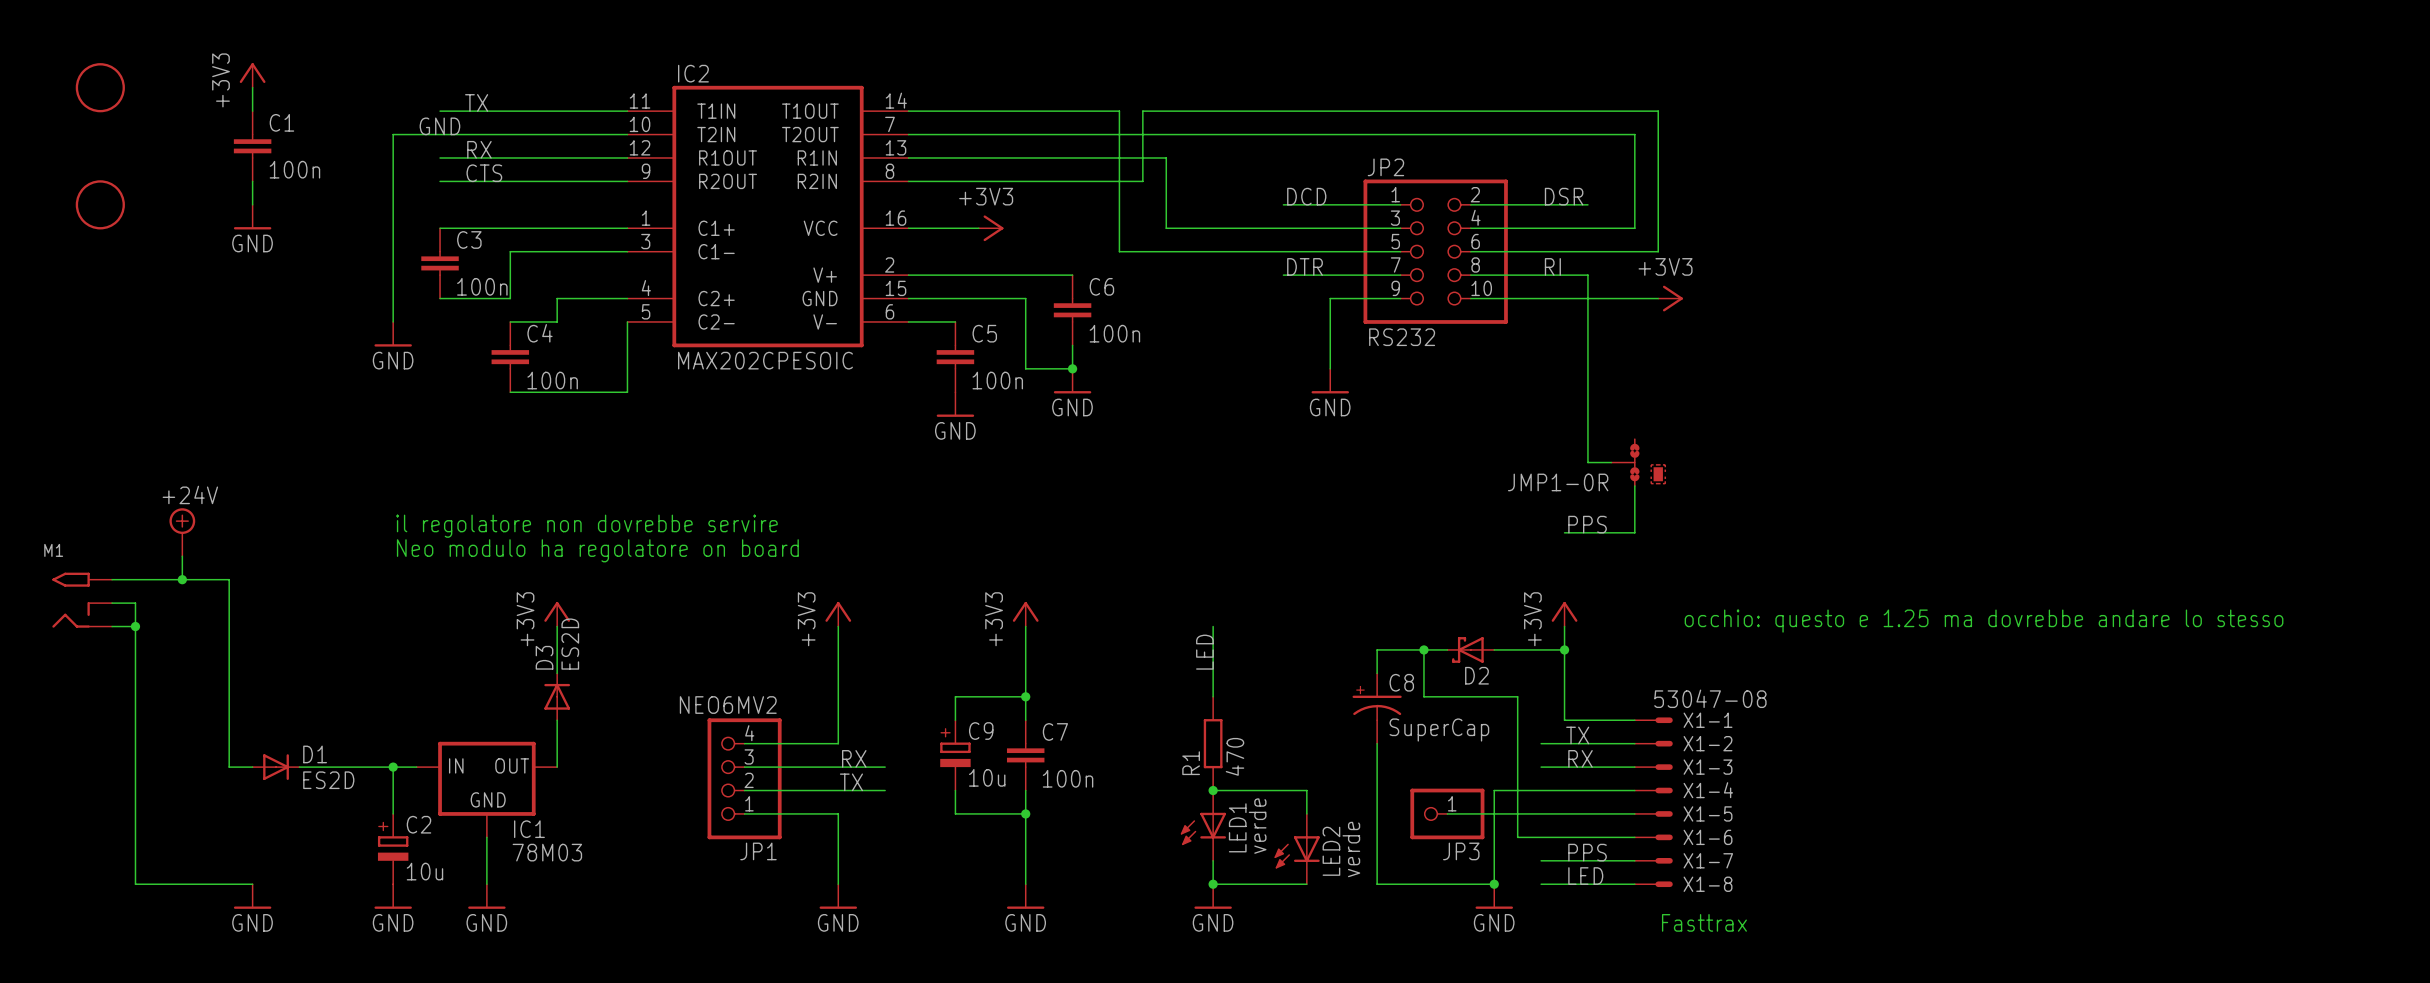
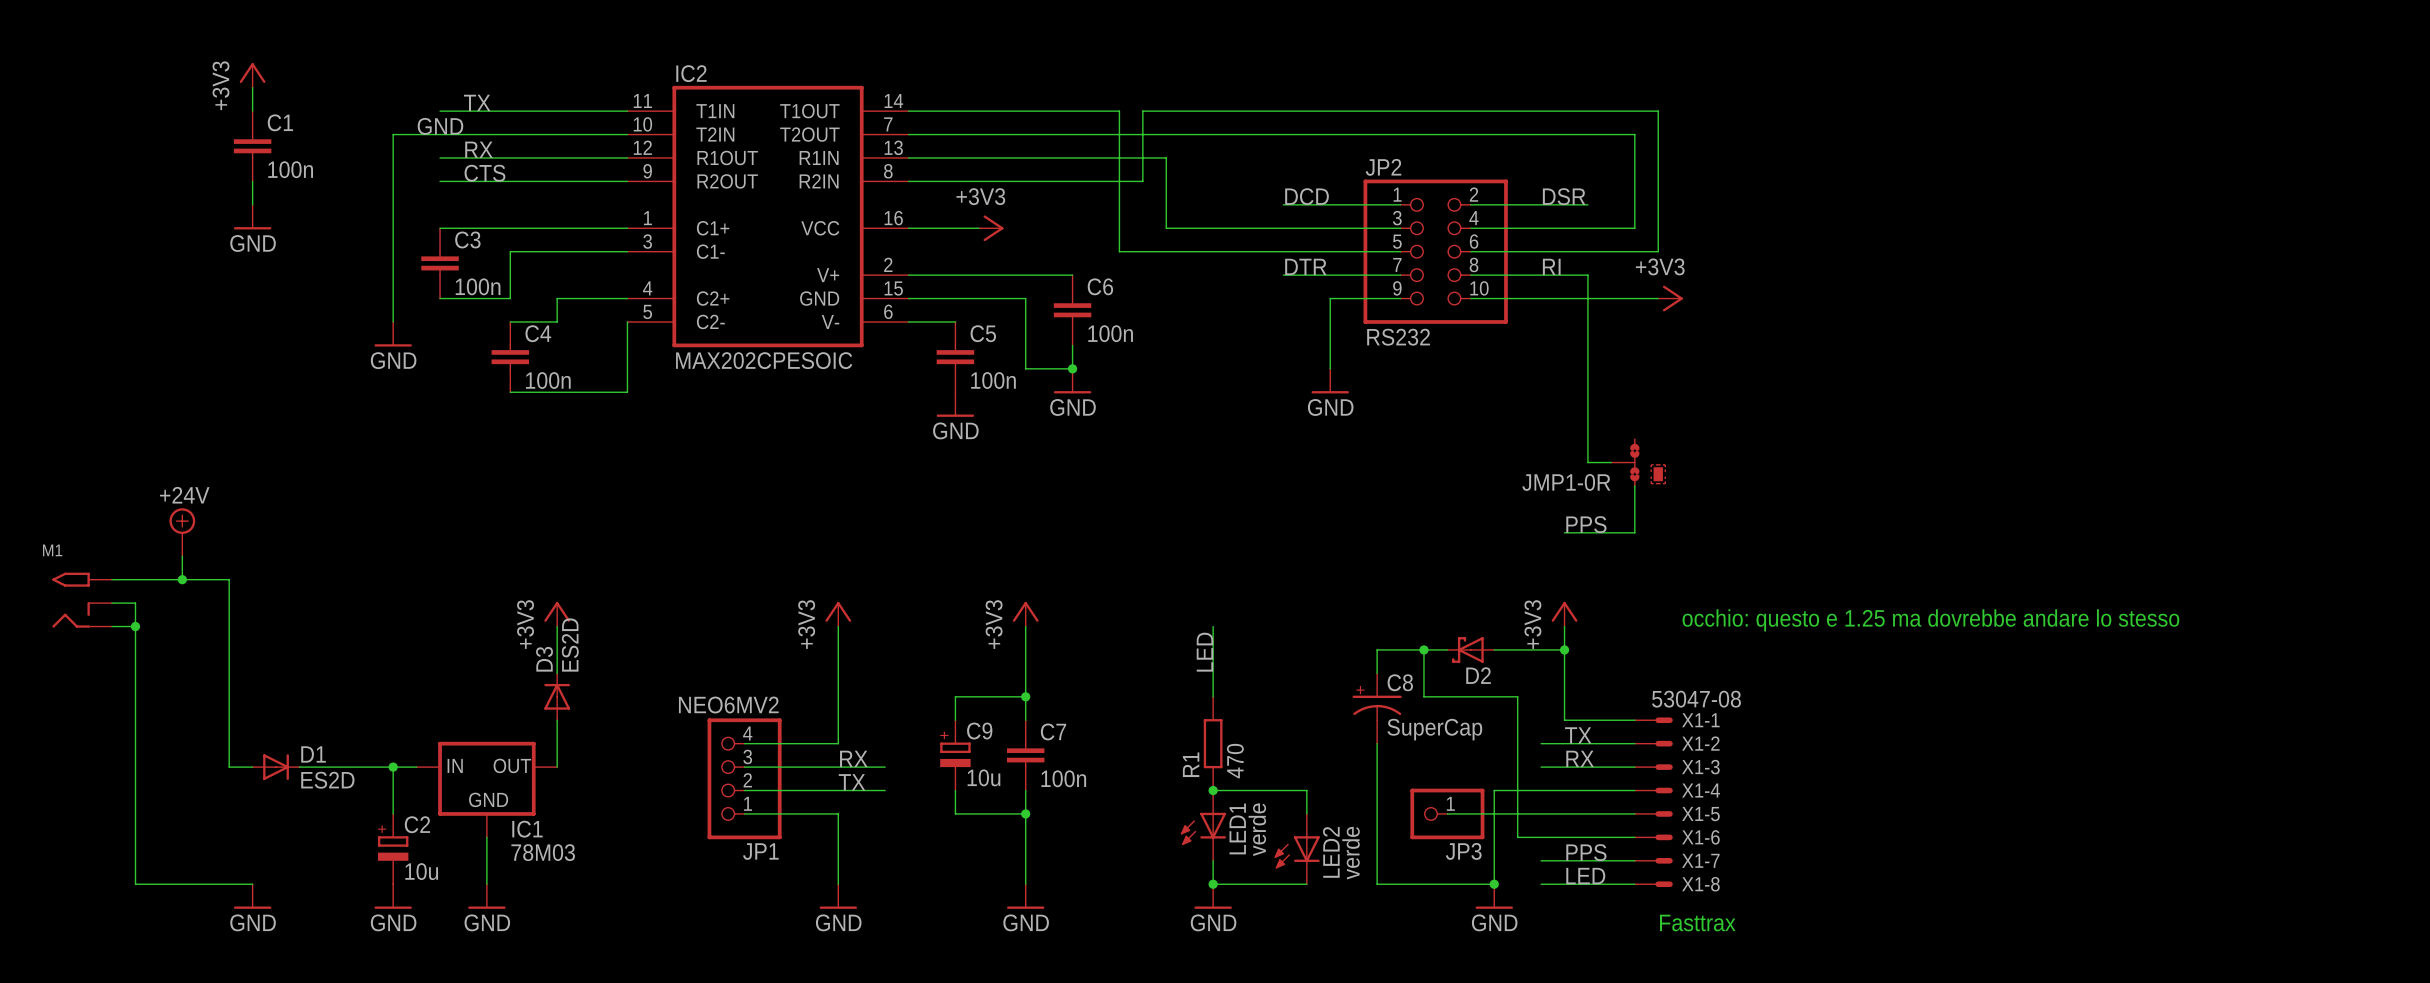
part: (100, 87) -> none
part: (100, 204) -> none
text: il regolatore non dovrebbe servire (586, 526) -> none
text: Neo modulo ha regolatore on board (597, 550) -> none

